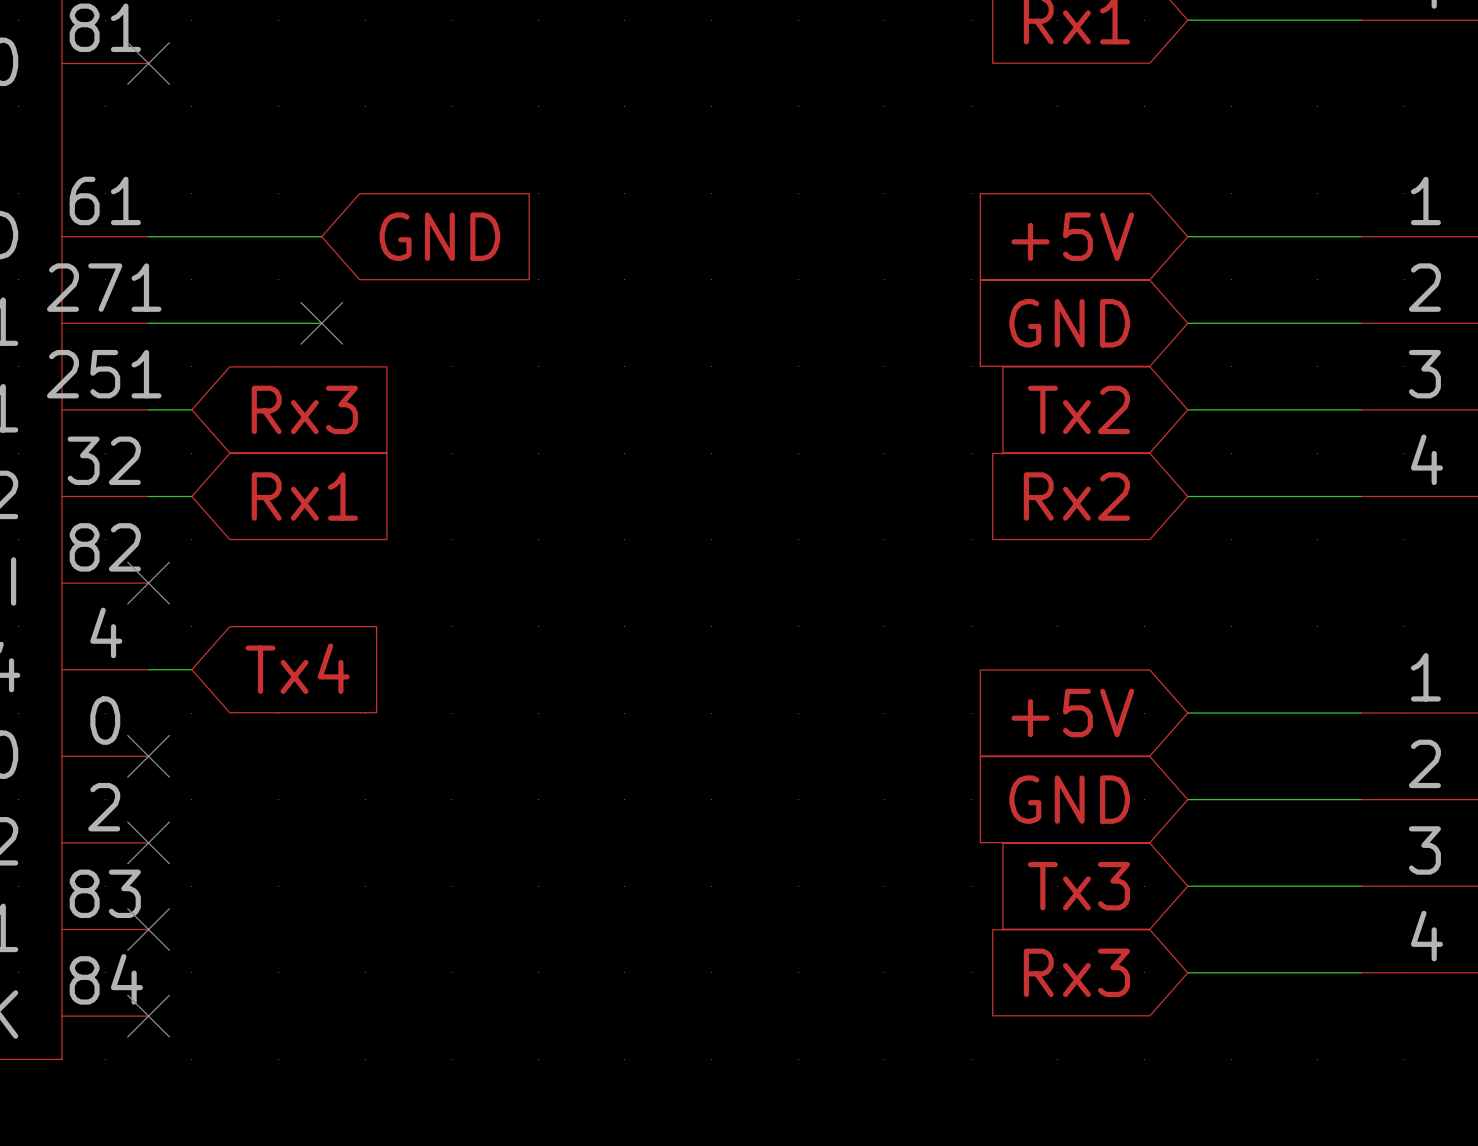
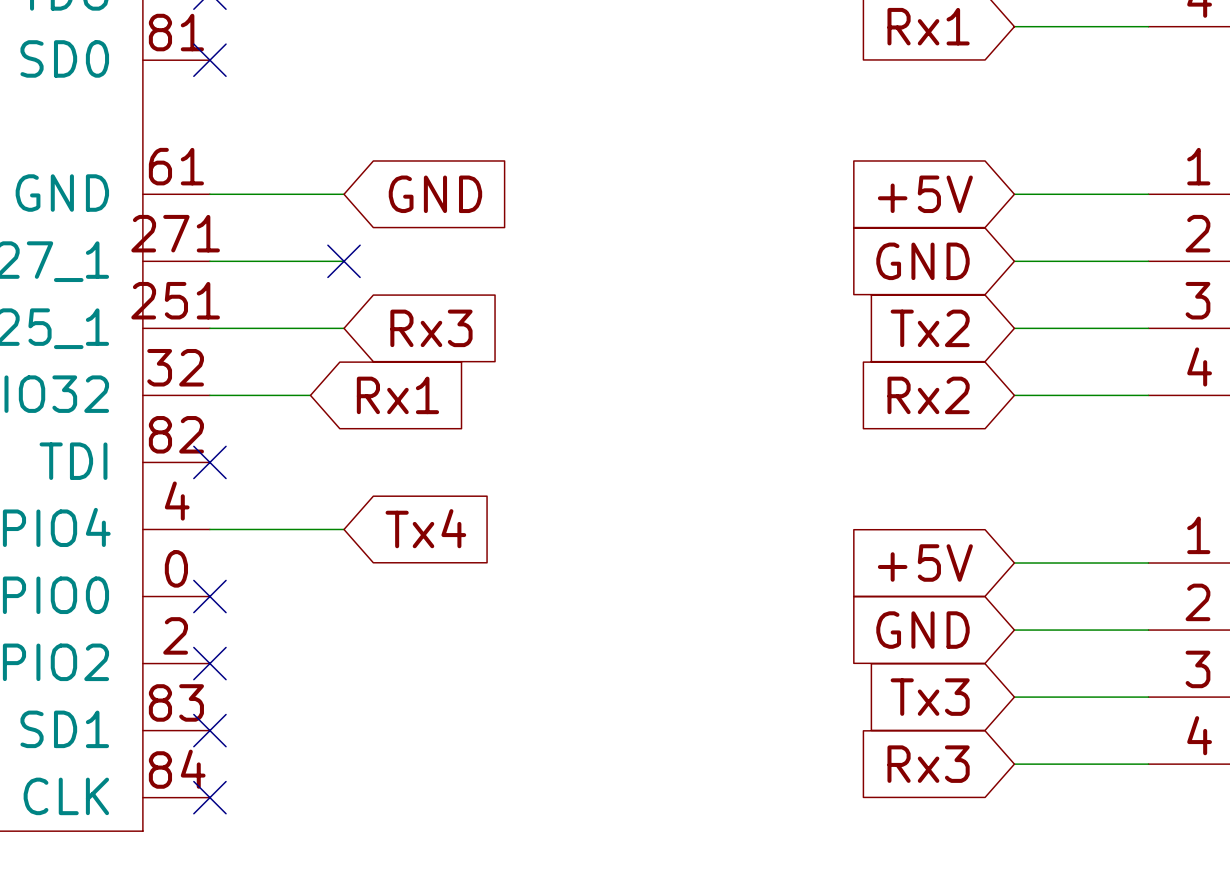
wire: none -> (243, 328) (344, 328)
global label position: Rx3 (304, 409) -> Rx3 (431, 328)
wire: none -> (243, 395) (310, 395)
global label position: Rx1 (304, 496) -> Rx1 (397, 395)
global label position: Tx4 (297, 668) -> Tx4 (425, 528)
wire: none -> (243, 529) (344, 529)

